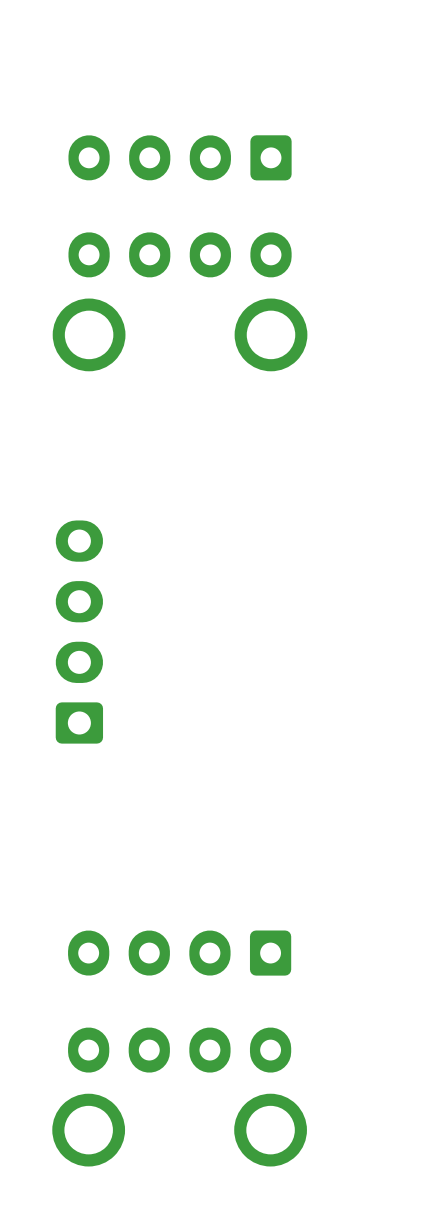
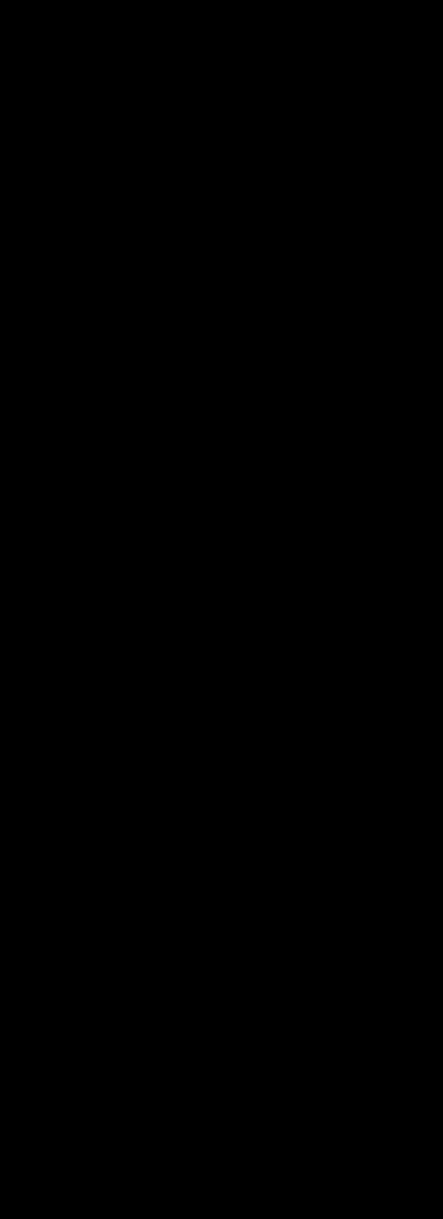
part: (180, 253) -> none
part: (79, 632) -> none
part: (179, 1048) -> none

